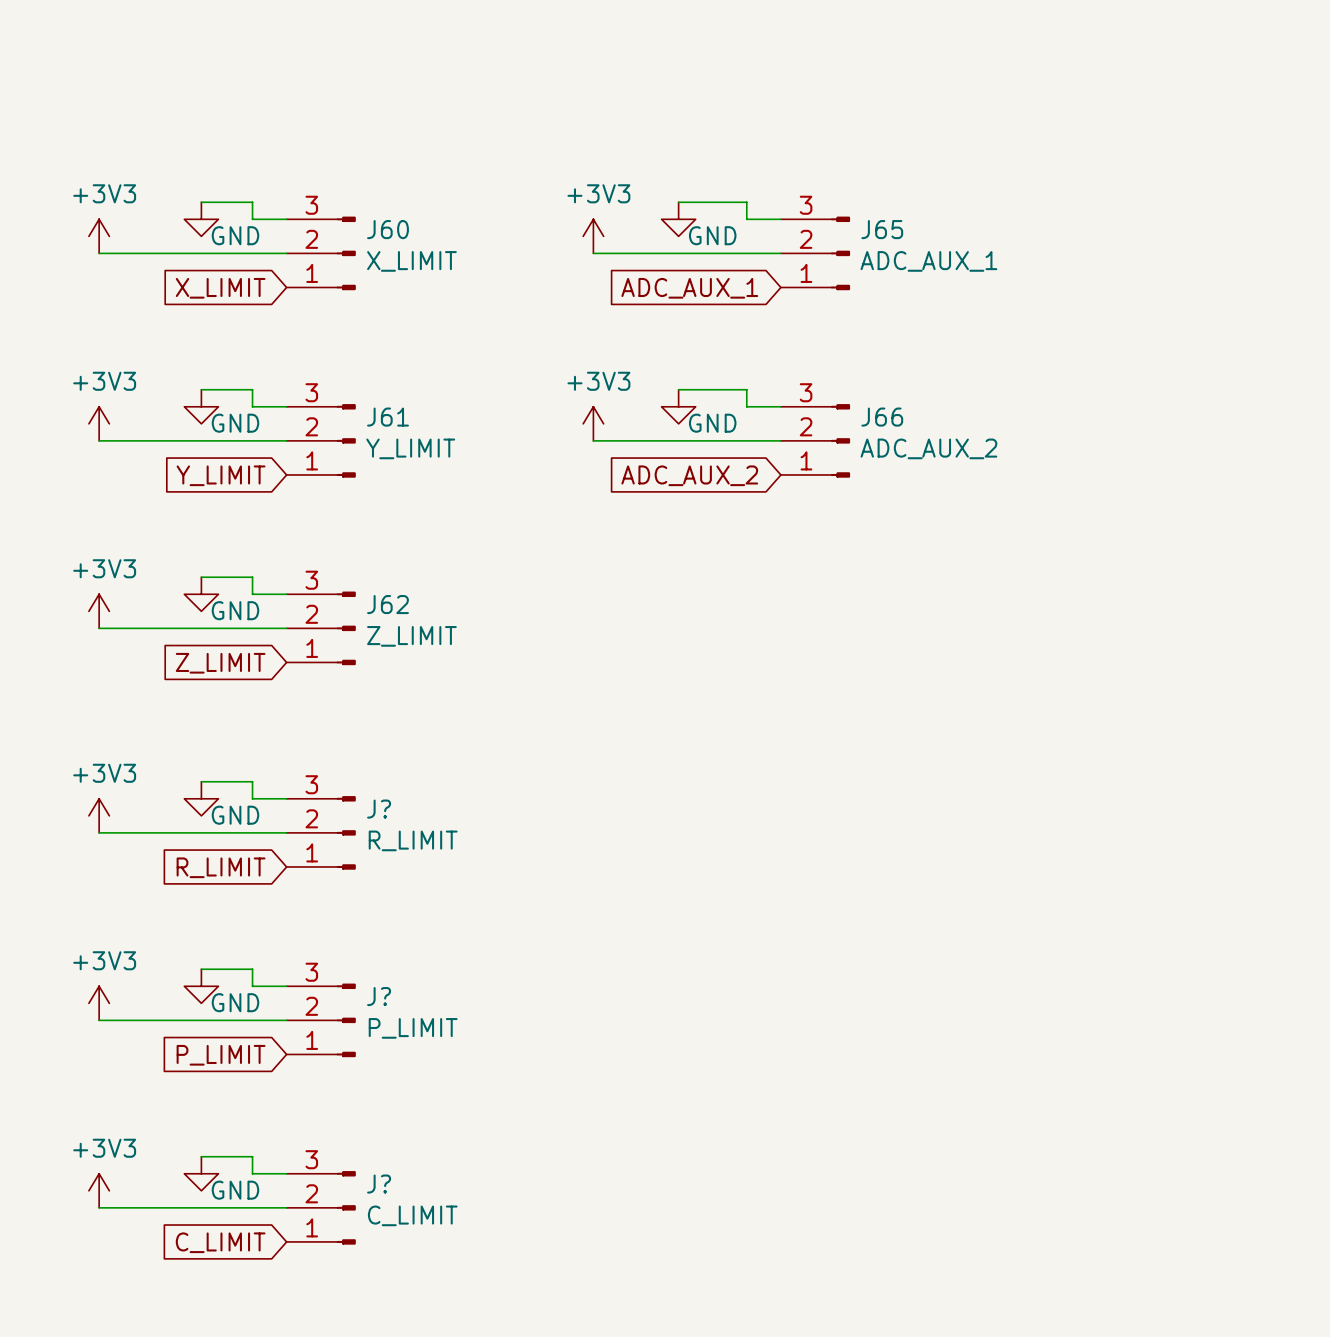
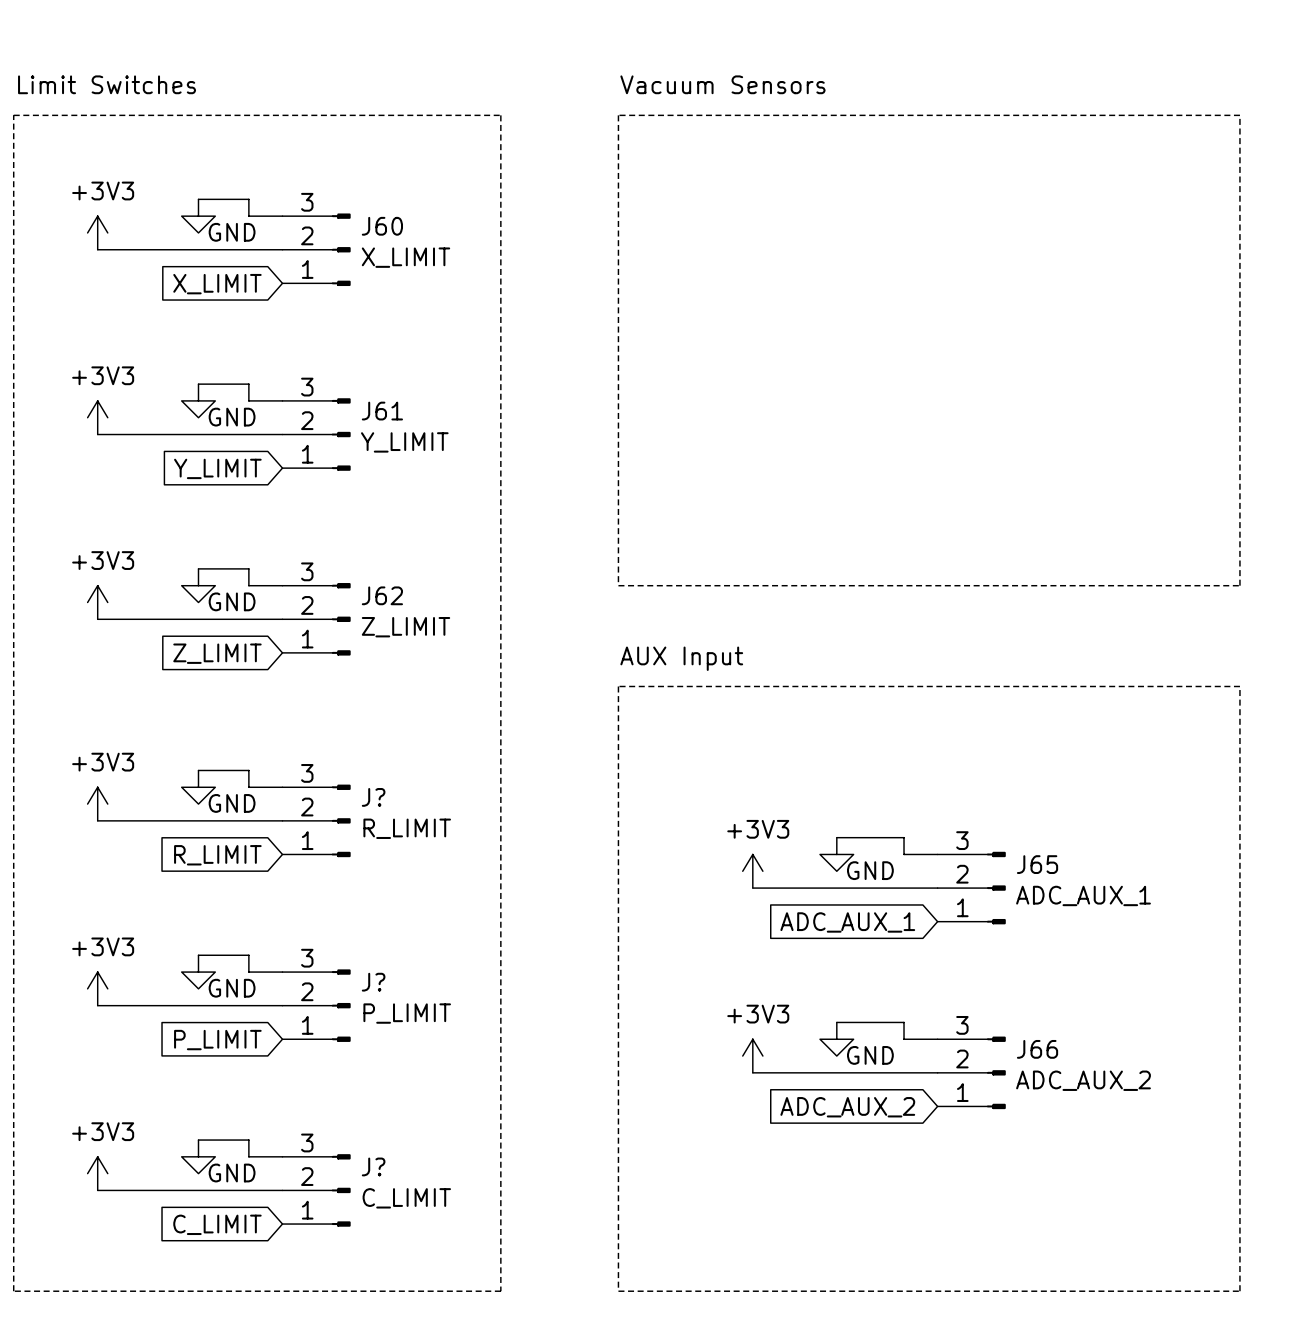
text: none -> Limit Switches (107, 84)
text: none -> Vacuum Sensors (722, 84)
line: none -> (13, 115) (500, 115) (500, 1291) (13, 1291) (13, 115)
line: none -> (618, 115) (1239, 115) (1239, 585) (618, 585) (618, 115)
wire: (678, 202) (746, 202) (746, 219) (780, 219) -> none
power symbol: GND (678, 219) -> none
power symbol: +3V3 (593, 236) -> none
wire: (593, 253) (780, 253) -> none
J65 position: (815, 253) -> (971, 888)
global label: ADC_AUX_1 (689, 288) -> none
wire: (678, 389) (746, 389) (746, 406) (780, 406) -> none
power symbol: GND (678, 406) -> none
power symbol: +3V3 (593, 423) -> none
wire: (593, 440) (780, 440) -> none
J66 position: (815, 440) -> (971, 1072)
global label: ADC_AUX_2 (689, 475) -> none
text: none -> AUX Input (681, 658)
line: none -> (618, 686) (618, 1291) (1239, 1291) (1239, 686) (618, 686)
wire: none -> (836, 837) (904, 837) (904, 854) (937, 854)
power symbol: none -> GND (836, 854)
power symbol: none -> +3V3 (752, 871)
wire: none -> (752, 888) (937, 888)
global label: none -> ADC_AUX_1 (847, 922)
wire: none -> (836, 1022) (904, 1022) (904, 1039) (937, 1039)
power symbol: none -> GND (836, 1039)
power symbol: none -> +3V3 (752, 1056)
wire: none -> (752, 1072) (937, 1072)
global label: none -> ADC_AUX_2 (847, 1107)

